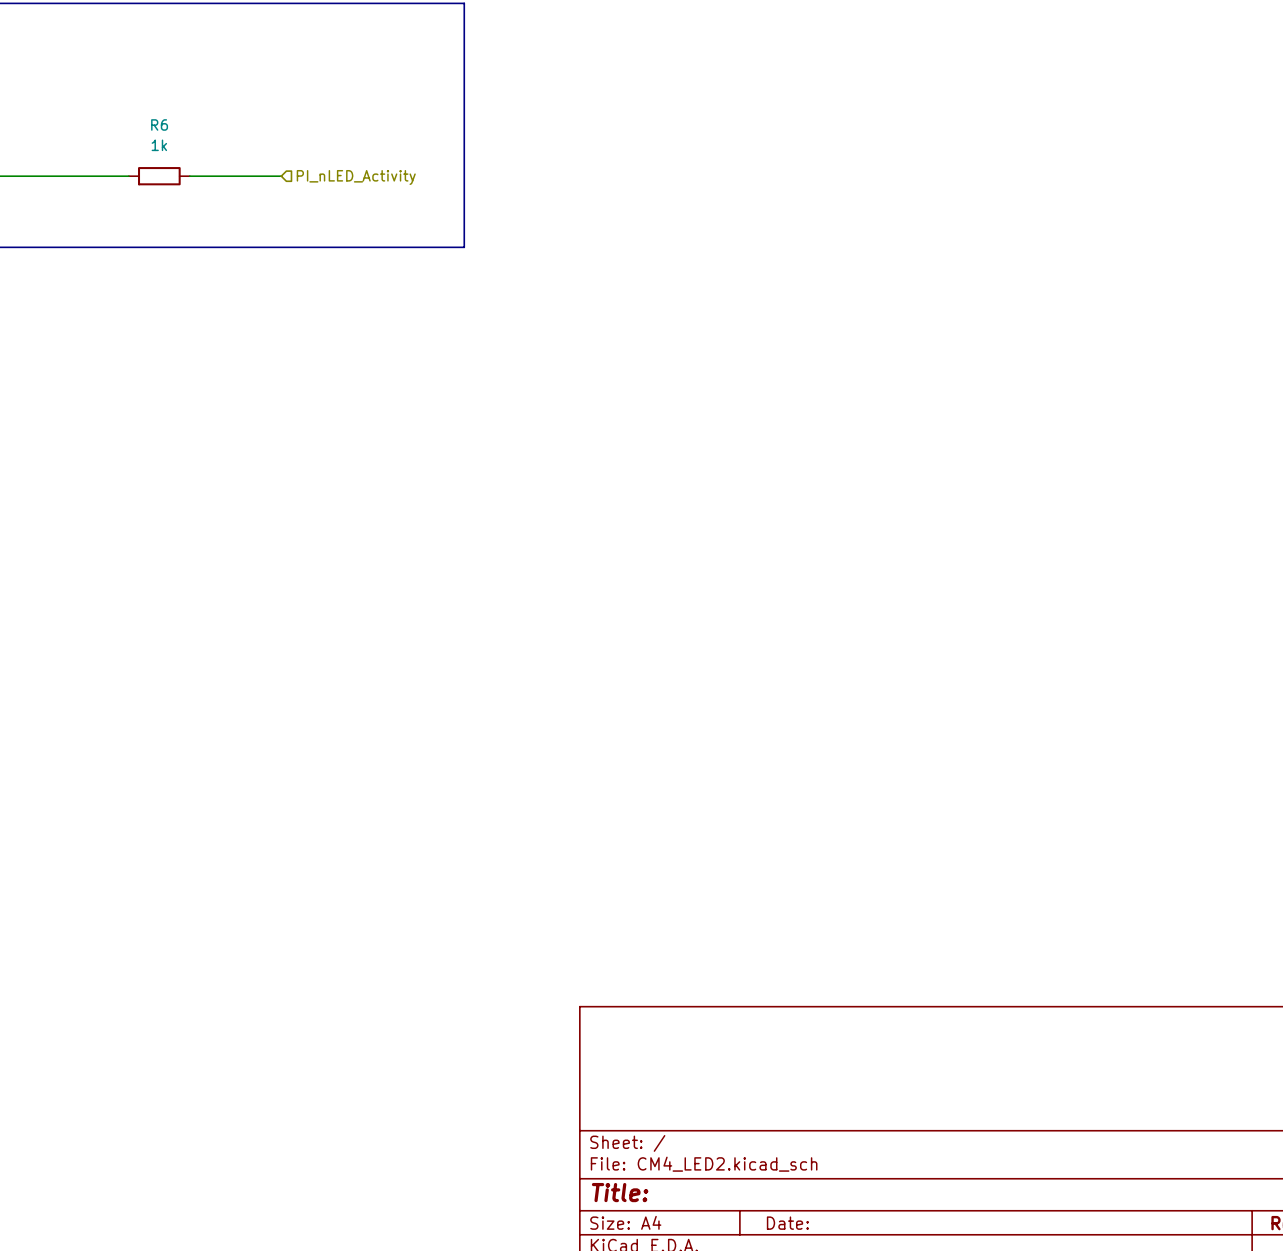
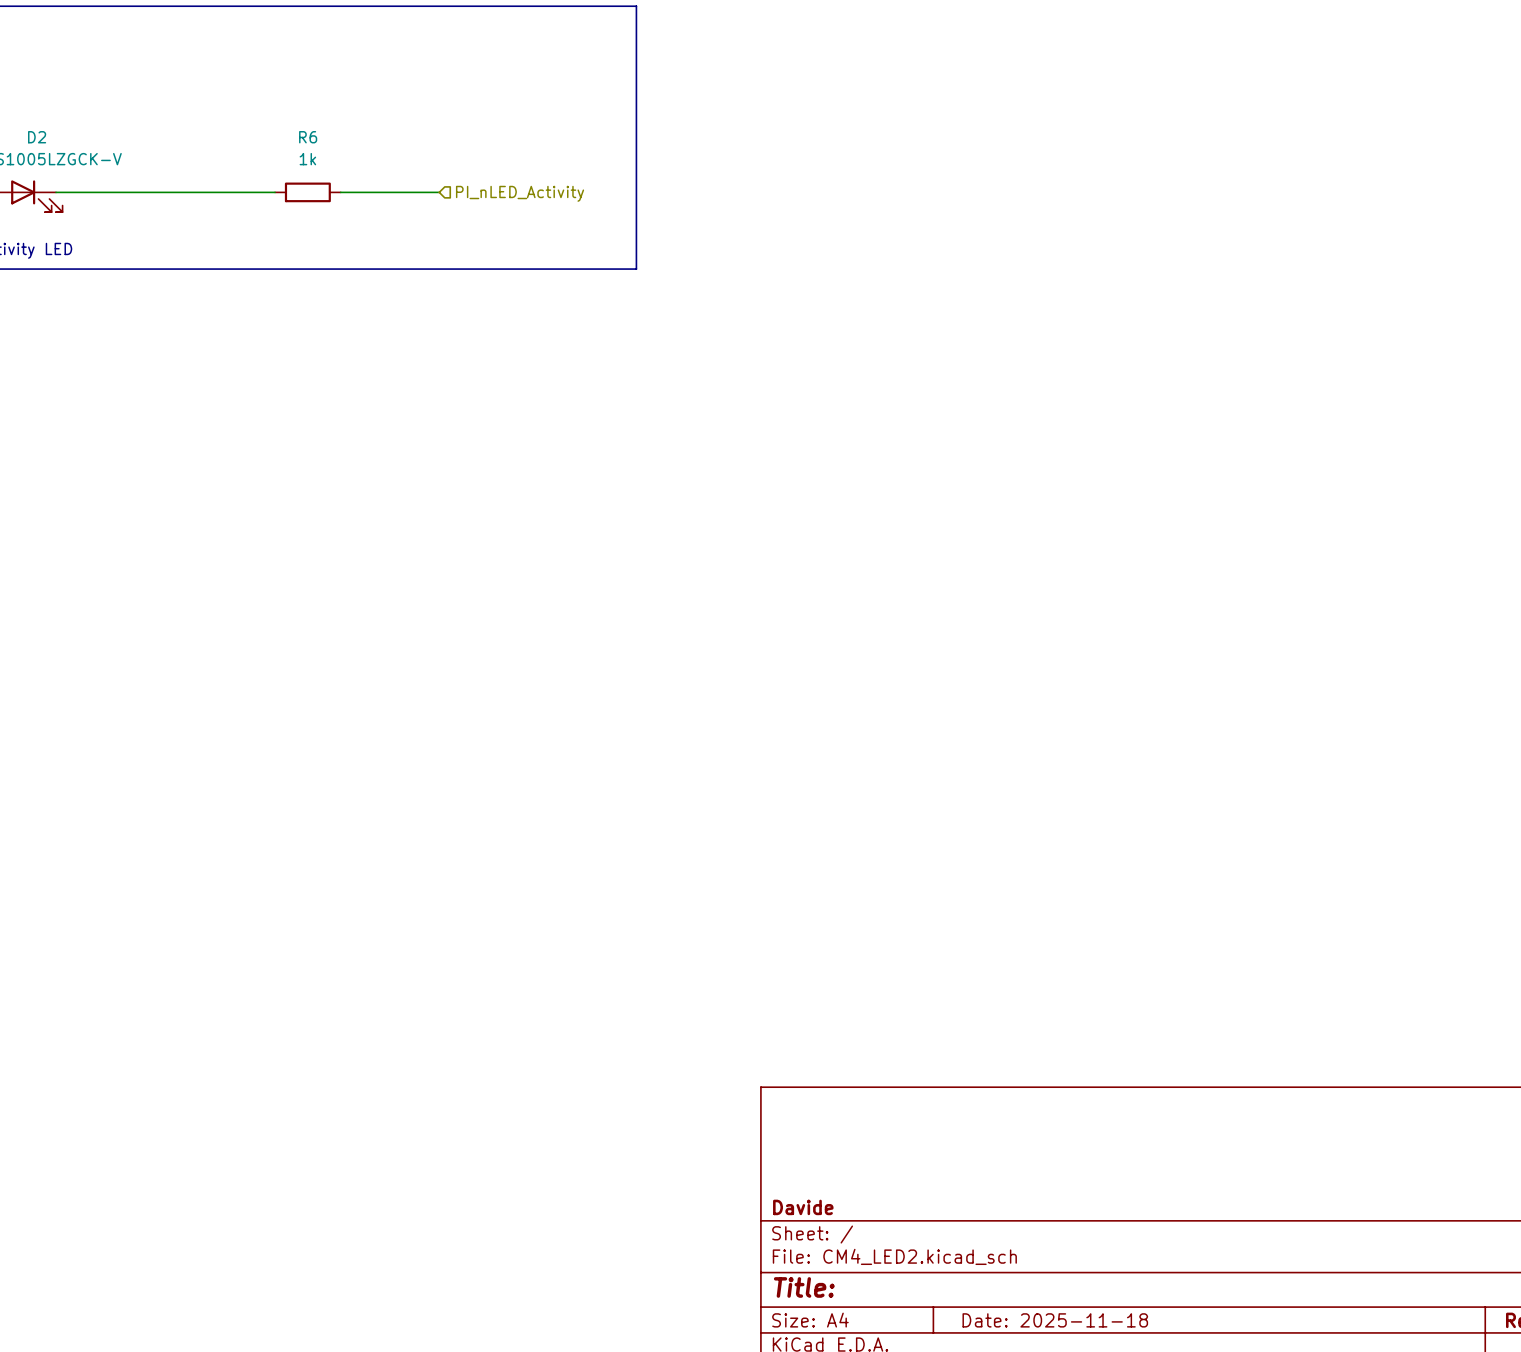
title block: none -> Davide (803, 1207)
title block: Date: (787, 1223) -> Date: 2025-11-18 (1055, 1320)

